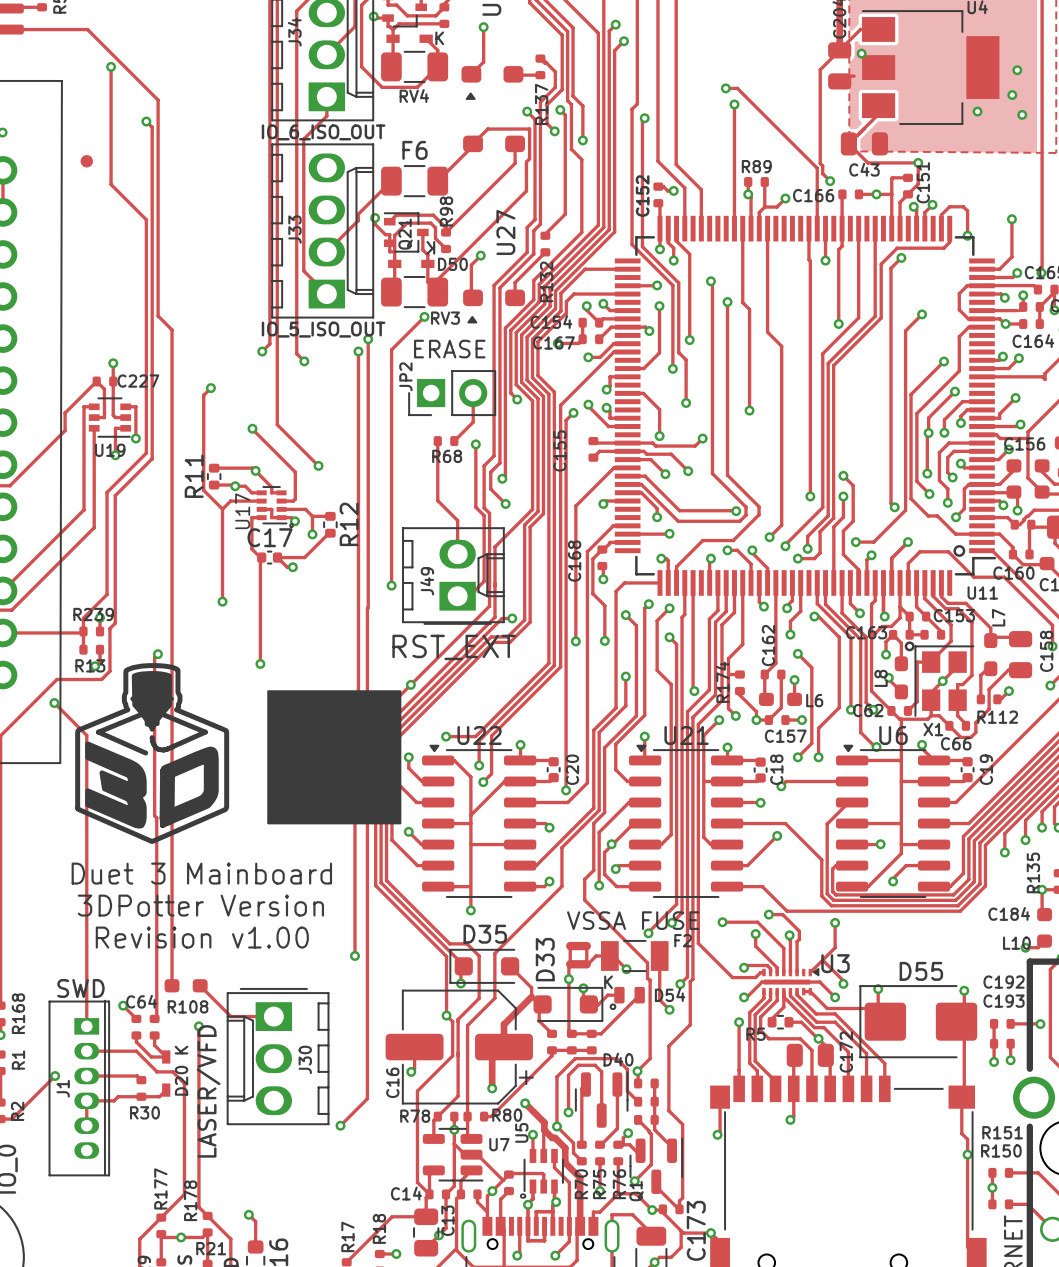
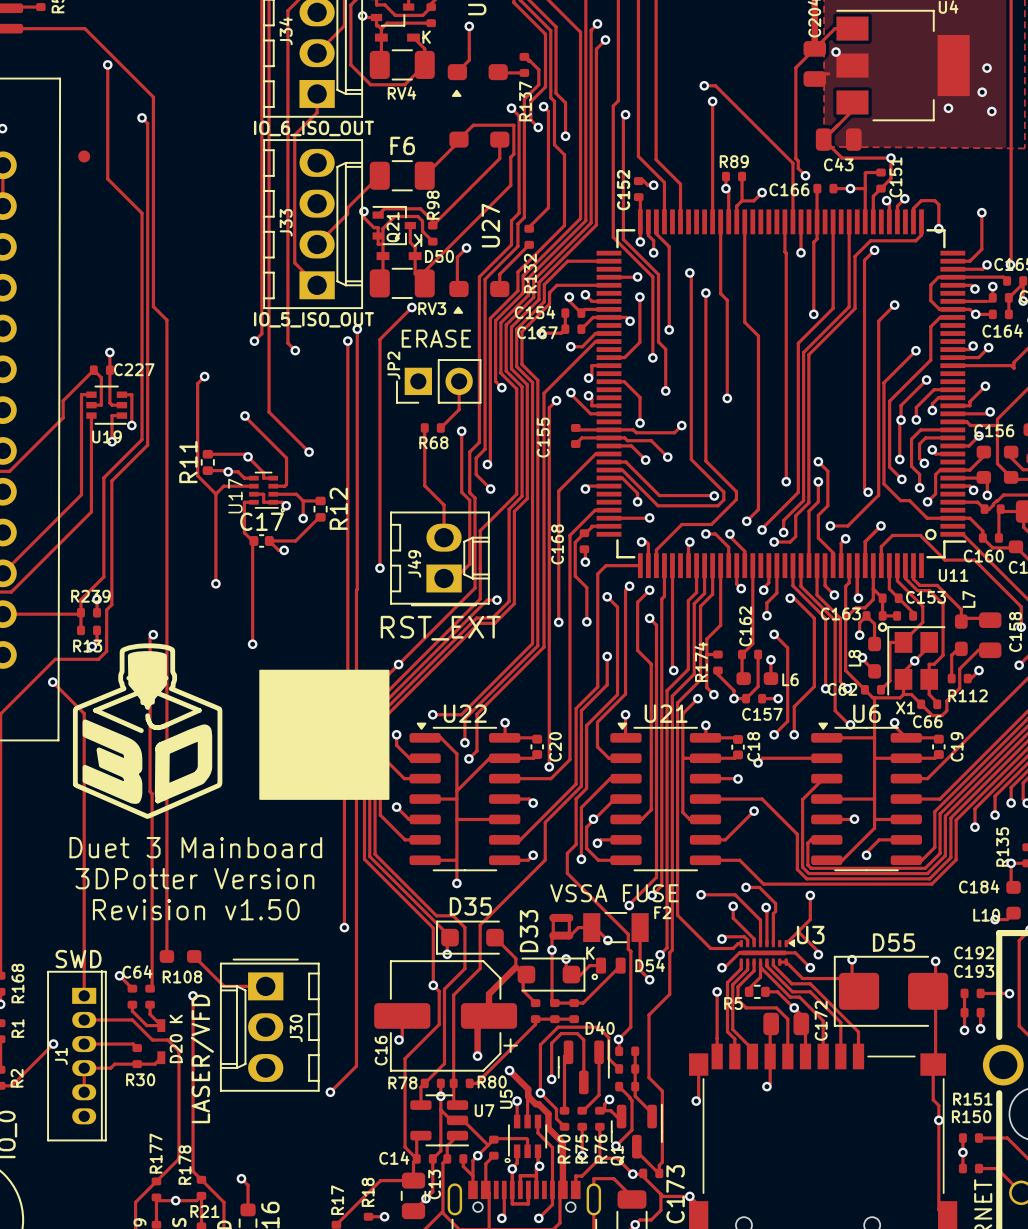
text: Revision v1.00 (202, 937) -> Revision v1.50 (196, 909)

